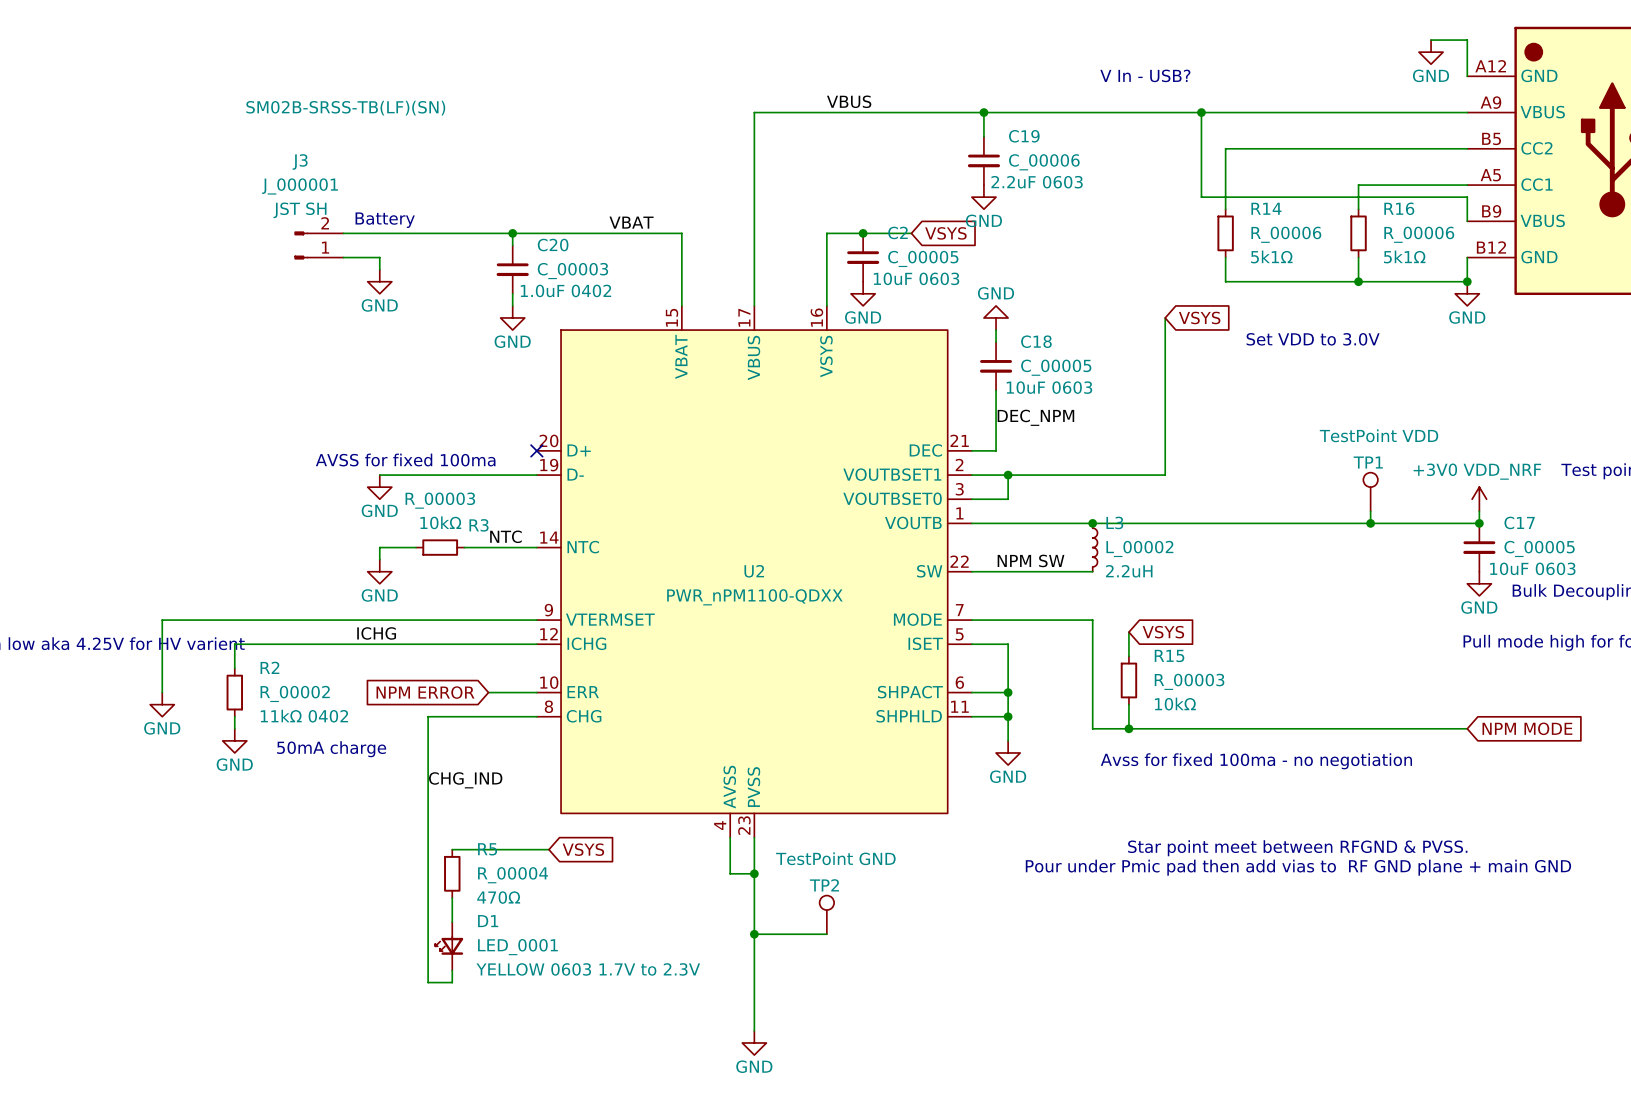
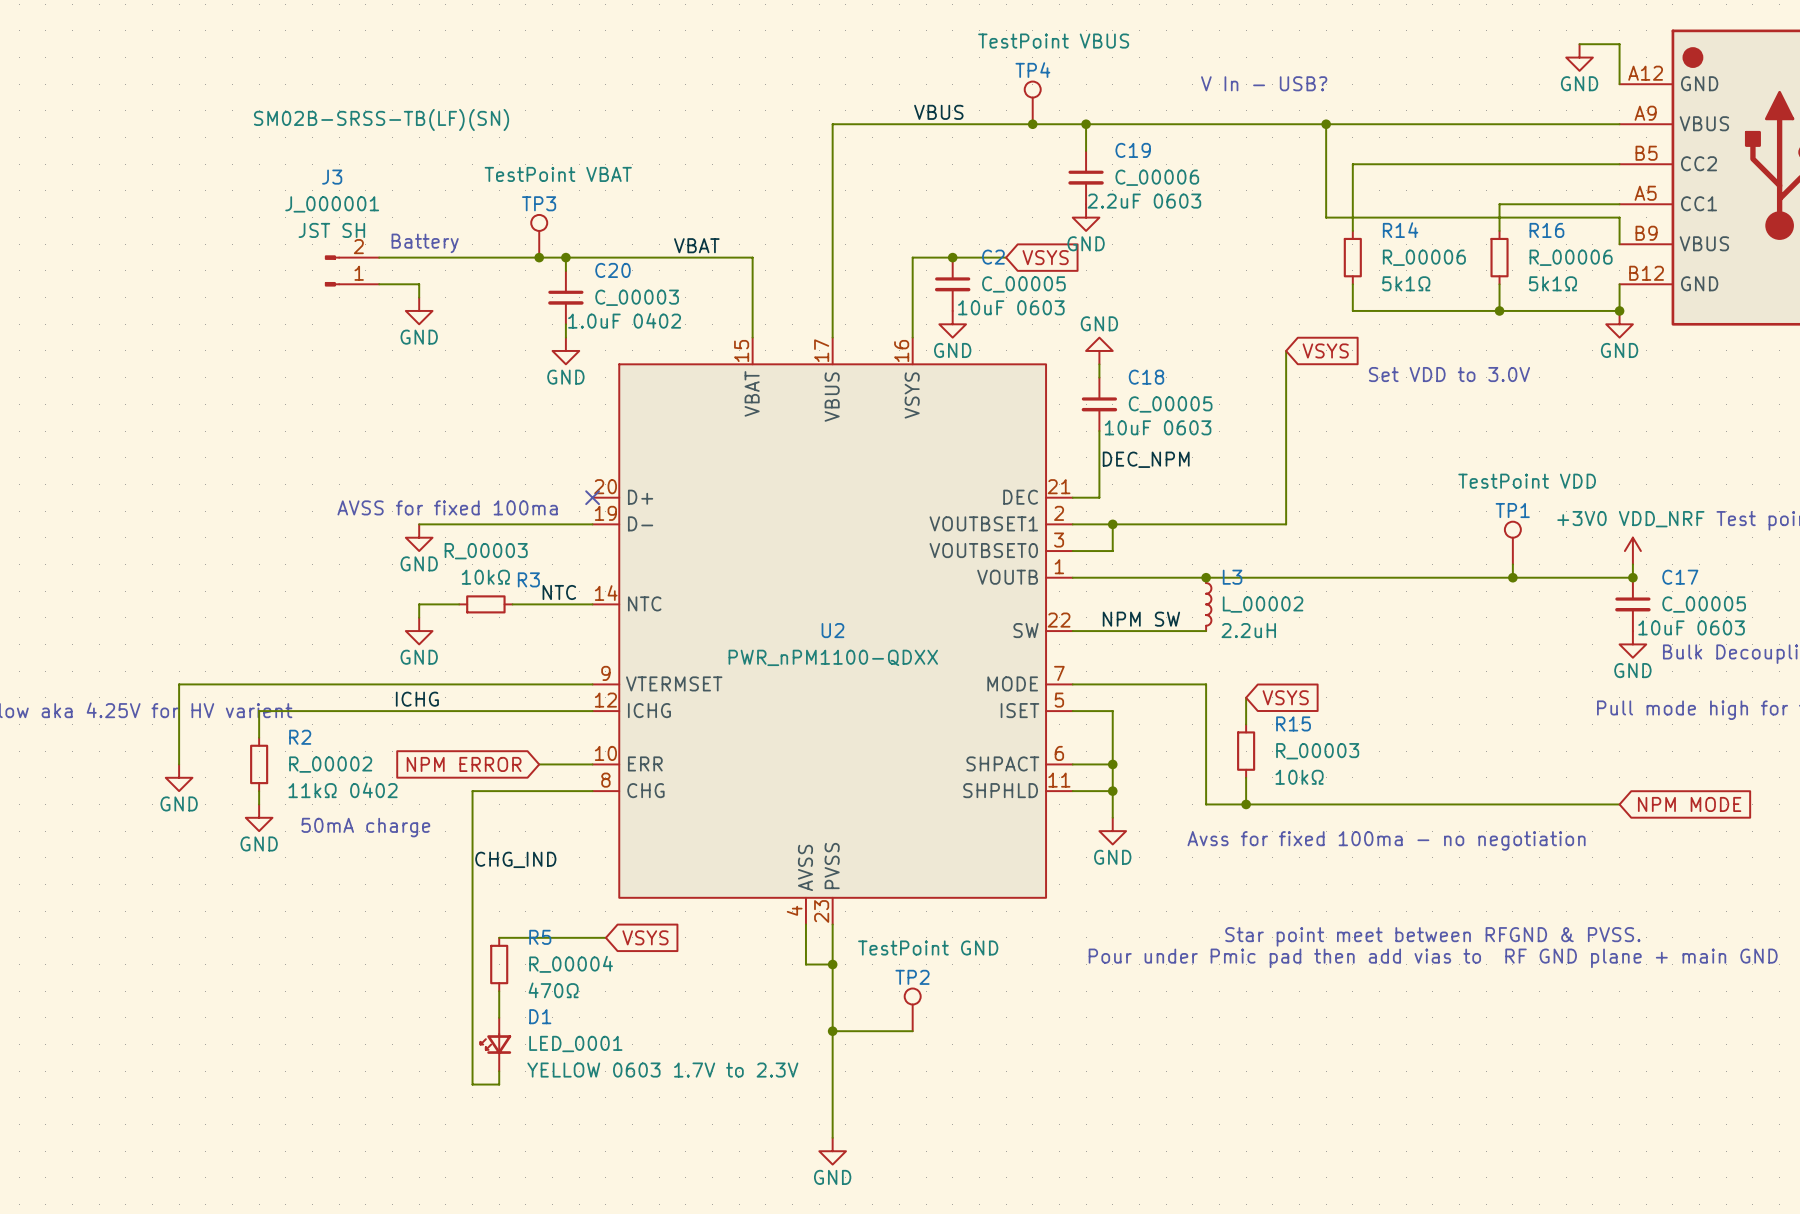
TP4: none -> TestPoint VBUS (1032, 102)
junction: none -> (1032, 124)
TP3: none -> TestPoint VBAT (539, 236)
junction: none -> (539, 257)

